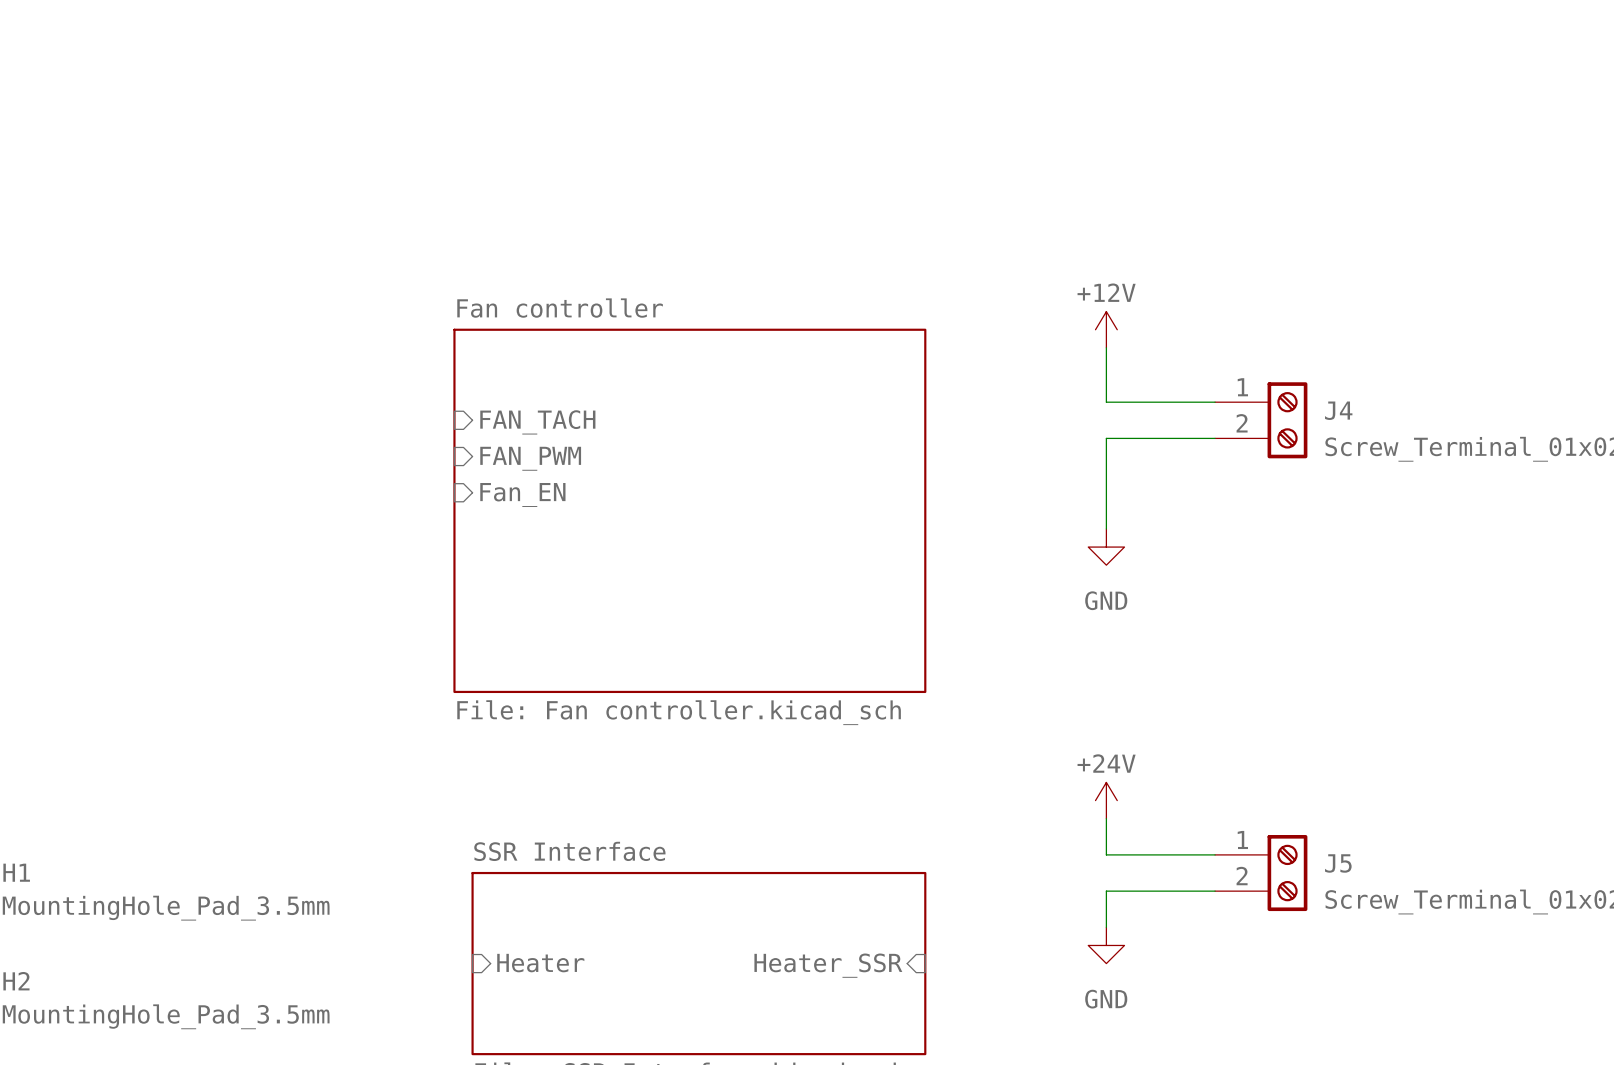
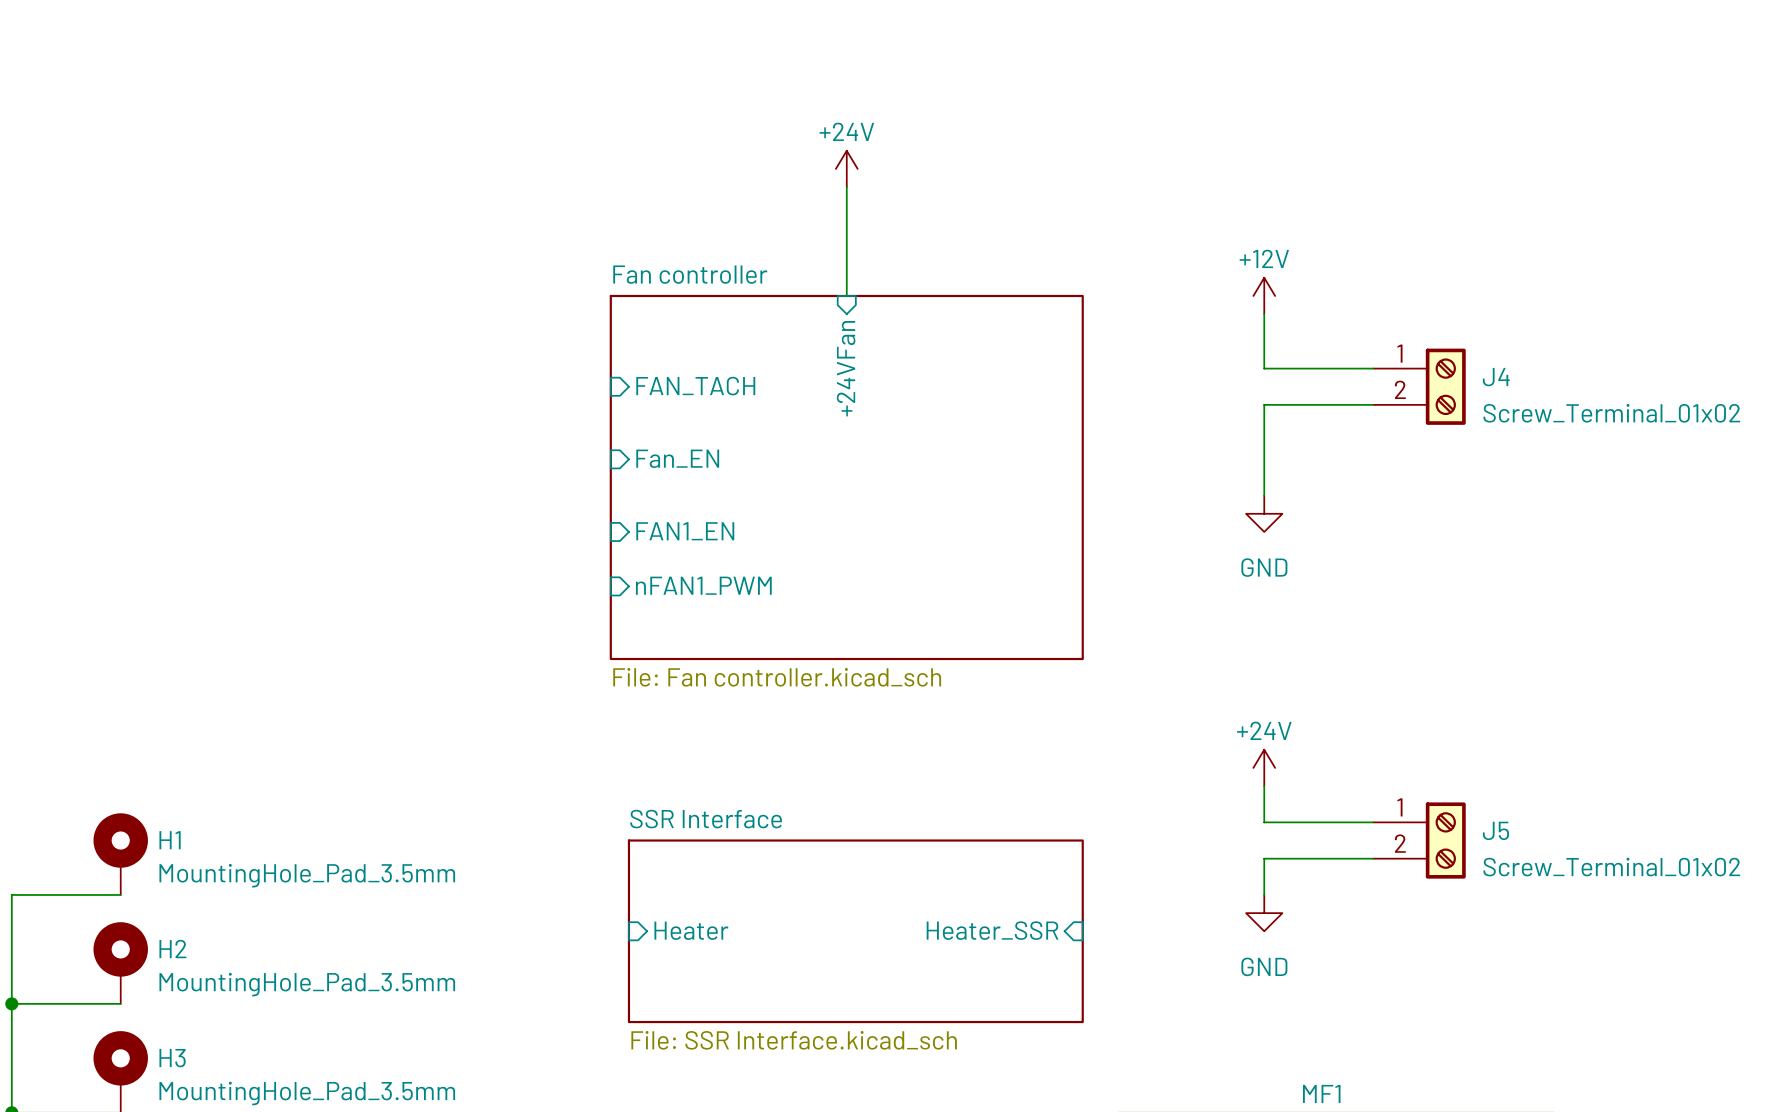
power symbol: none -> +24V (846, 168)
wire: none -> (846, 187) (846, 295)
sheet pin: none -> +24VFan (846, 368)
sheet pin: FAN_PWM (530, 458) -> none
sheet pin: none -> FAN1_EN (685, 531)
sheet pin: none -> nFAN1_PWM (703, 585)

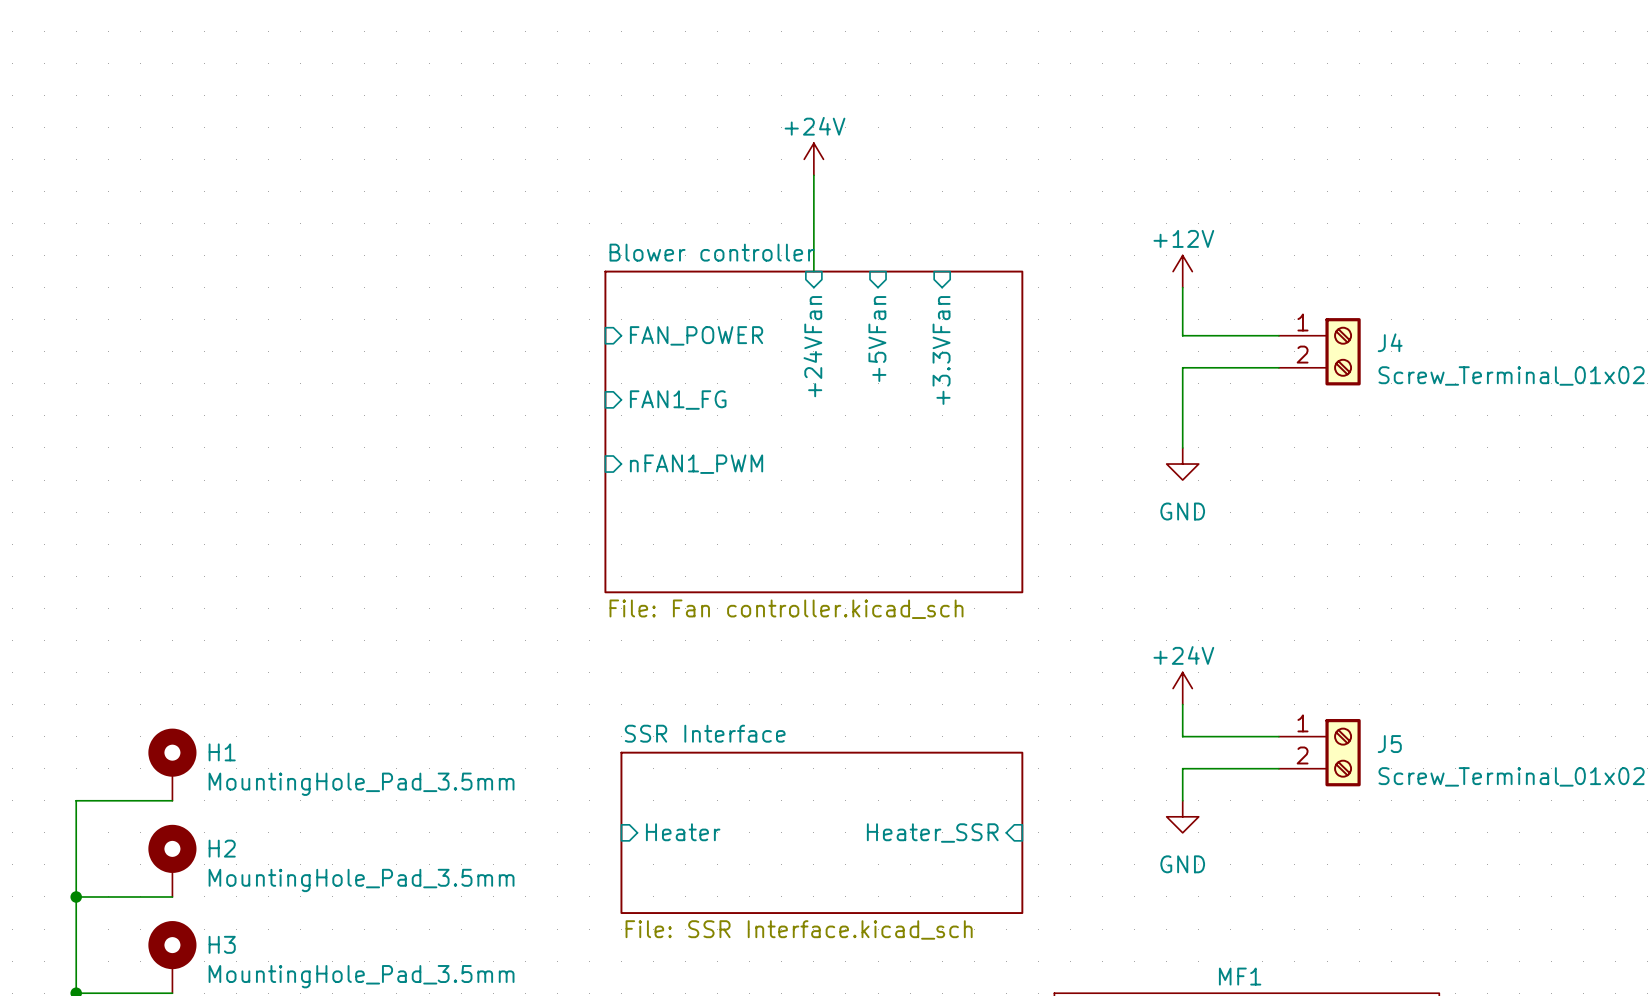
sheet Fan controller name: Fan controller (690, 274) -> Blower controller (712, 252)
sheet pin: none -> +5VFan (877, 339)
sheet pin: none -> FAN_POWER (696, 335)
sheet pin: none -> +3.3VFan (941, 350)
sheet pin: FAN_TACH (695, 386) -> none
sheet pin: none -> FAN1_FG (678, 400)
sheet pin: Fan_EN (677, 458) -> none
sheet pin: FAN1_EN (685, 531) -> none
sheet pin position: nFAN1_PWM (703, 585) -> nFAN1_PWM (696, 464)

